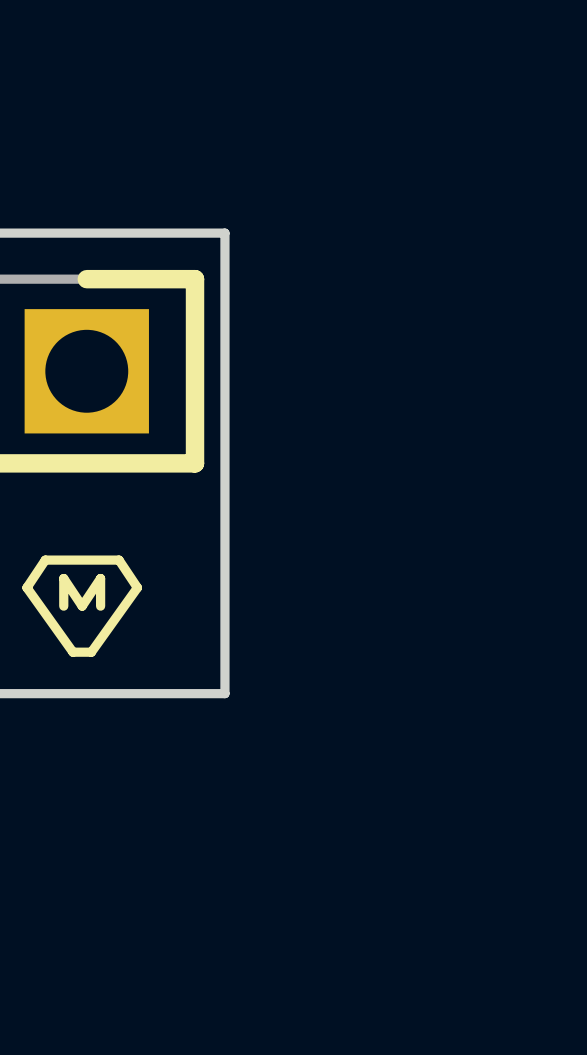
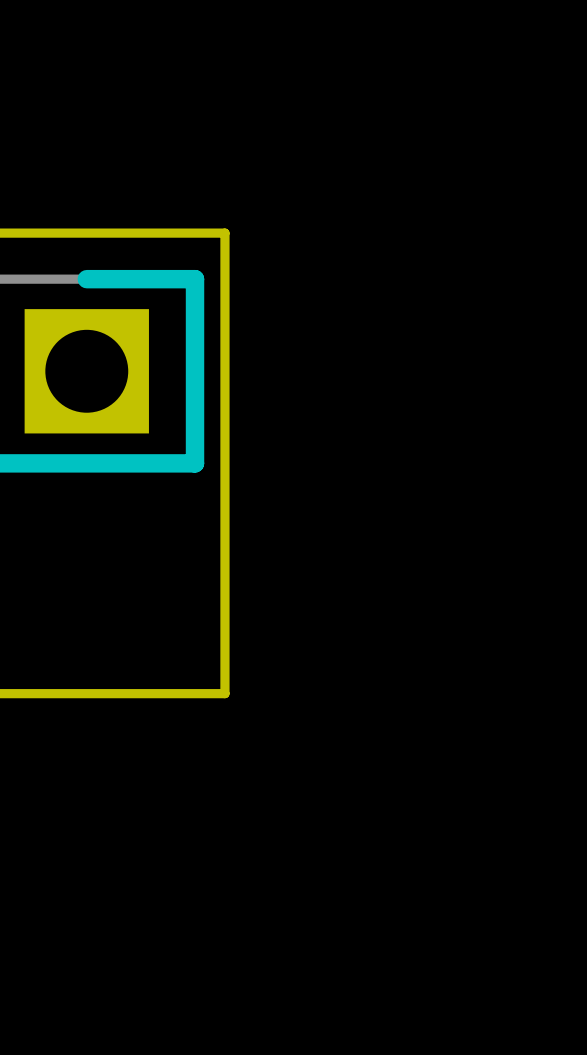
line: (119, 560) (45, 560) (26, 587) (72, 652) (91, 652) (137, 587) (119, 560) -> none
line: (100, 606) (100, 578) (82, 606) (63, 578) (63, 606) -> none

